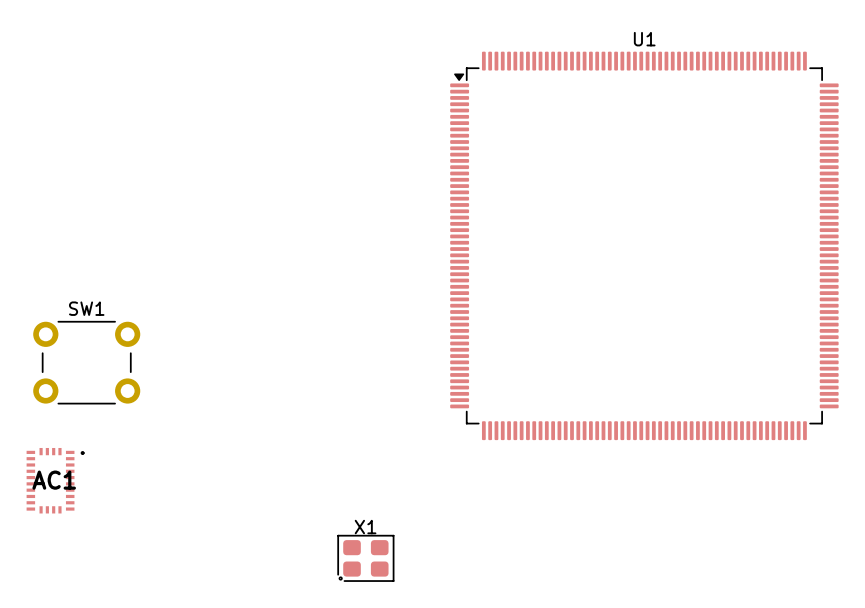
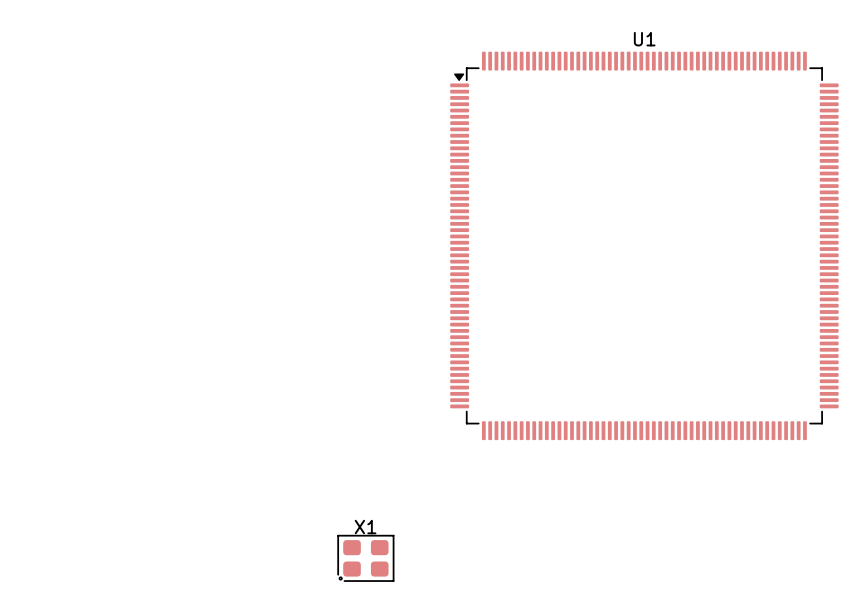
SW1: (86, 362) -> none
AC1: (55, 480) -> none

